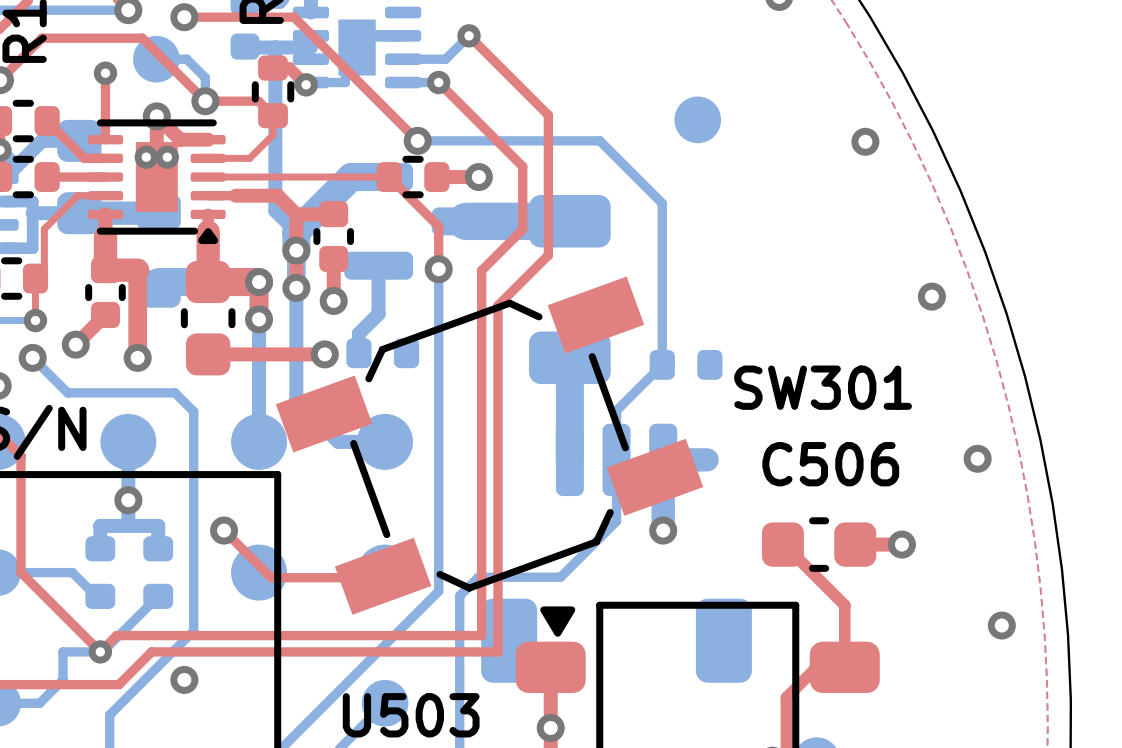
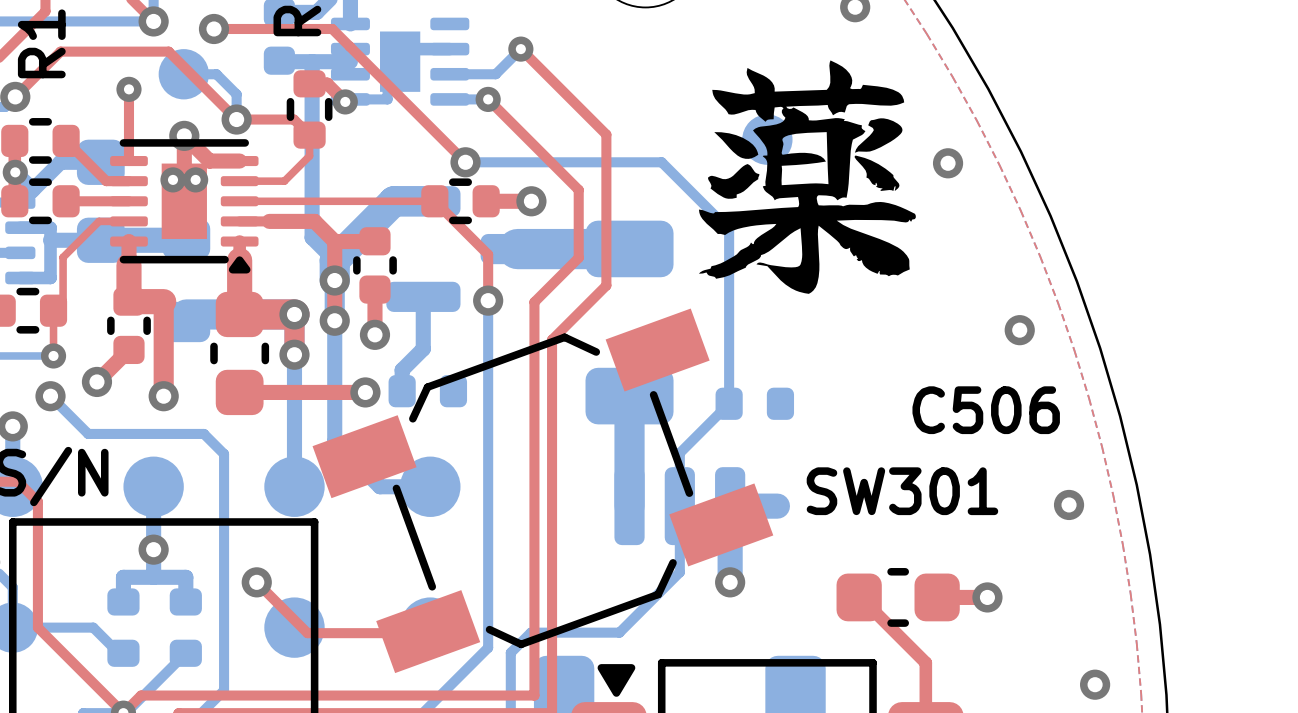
drawing: none -> [698, 60, 916, 294]
SW301 name position: SW301 (823, 387) -> SW301 (902, 491)
C506 name position: C506 (830, 464) -> C506 (986, 410)

